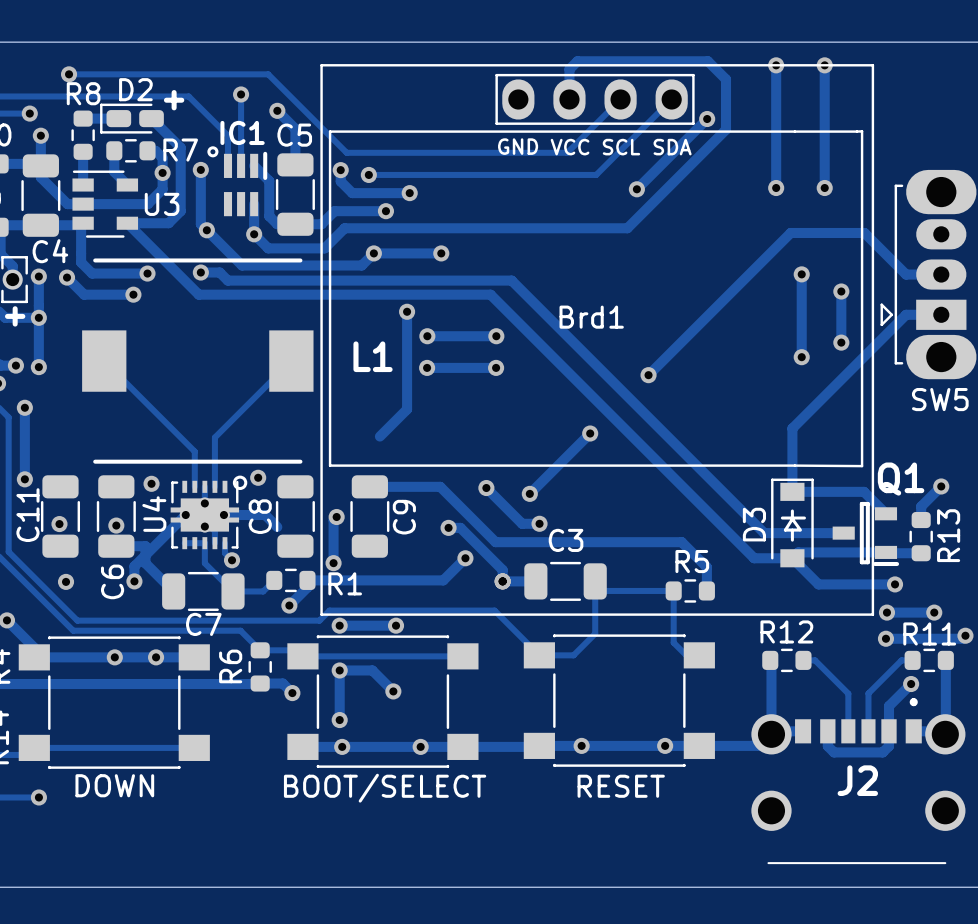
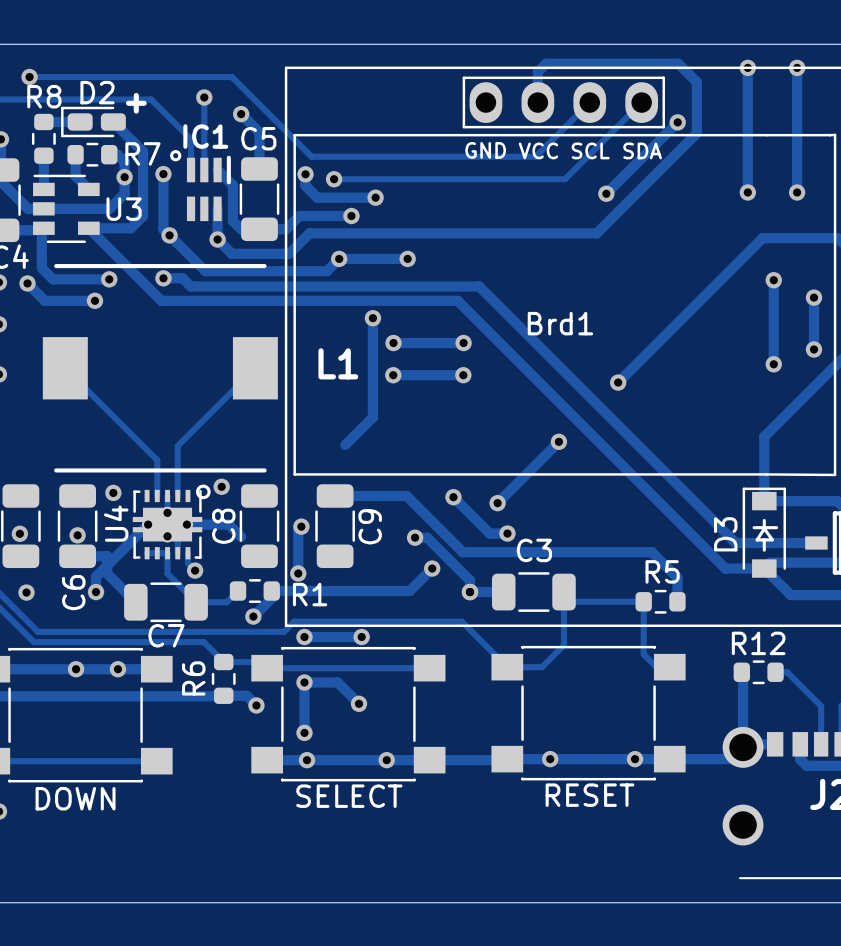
RESET name: none -> RESET (590, 795)
SELECT name: none -> SELECT (349, 796)
DOWN name: none -> DOWN (75, 798)
DOWN value: DOWN (114, 785) -> none
RESET value: RESET (621, 786) -> none
SELECT value: BOOT/SELECT (385, 788) -> none

